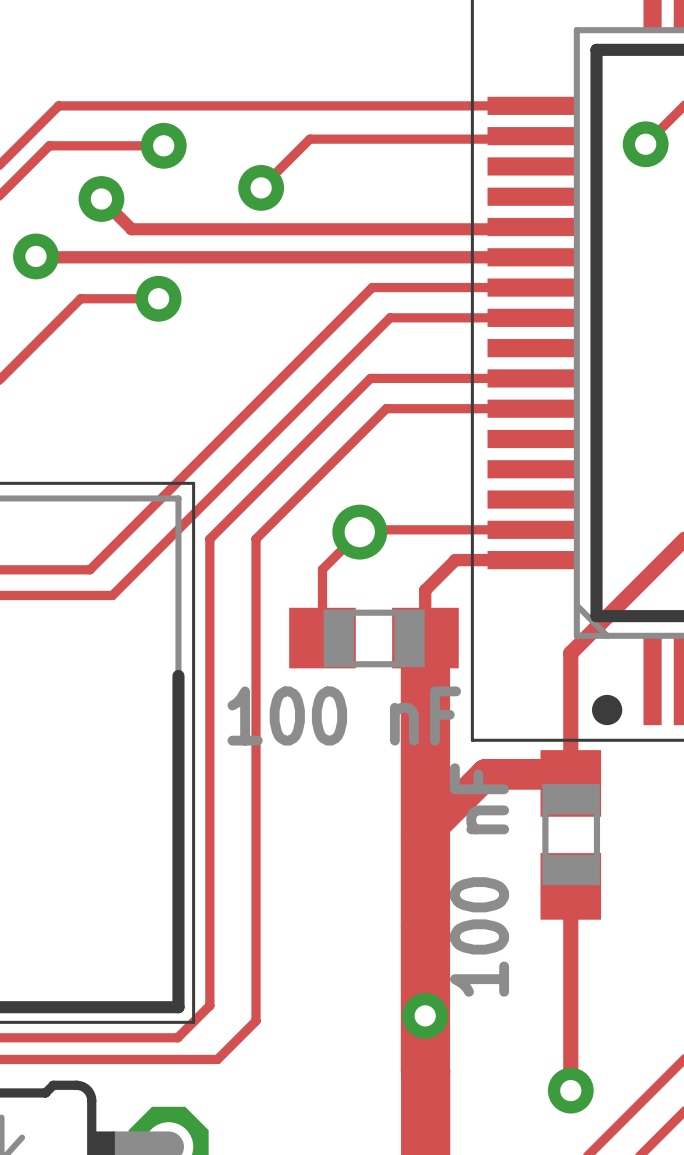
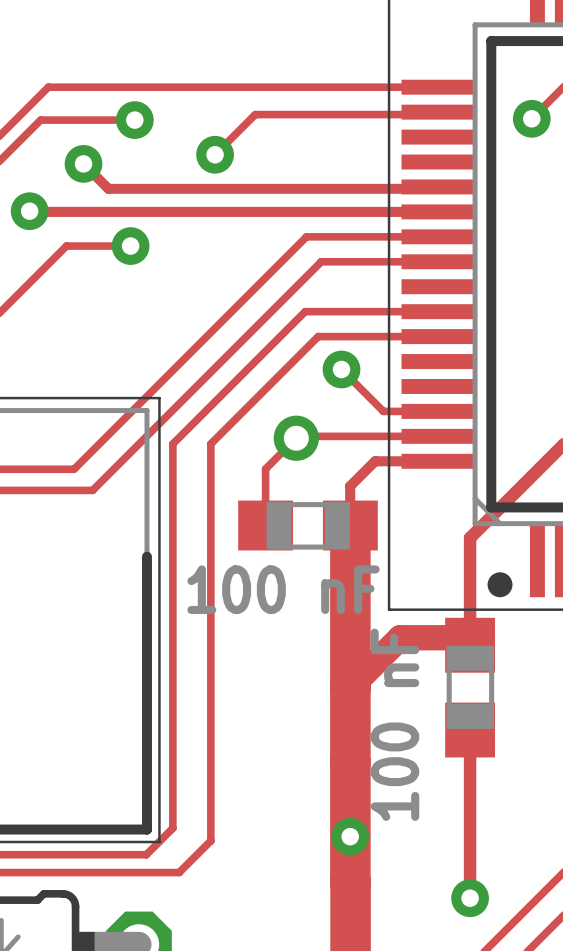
track: none -> (341, 369) (383, 411) (437, 411)
via: none -> (341, 369)

